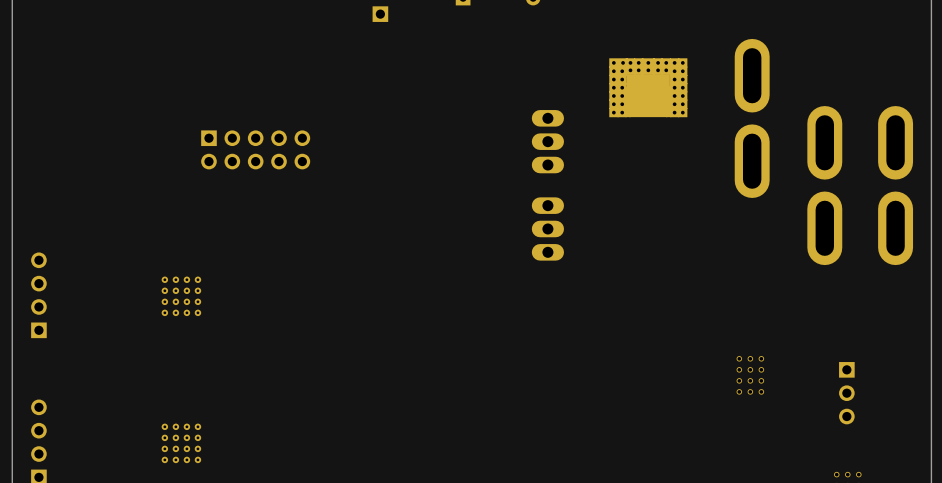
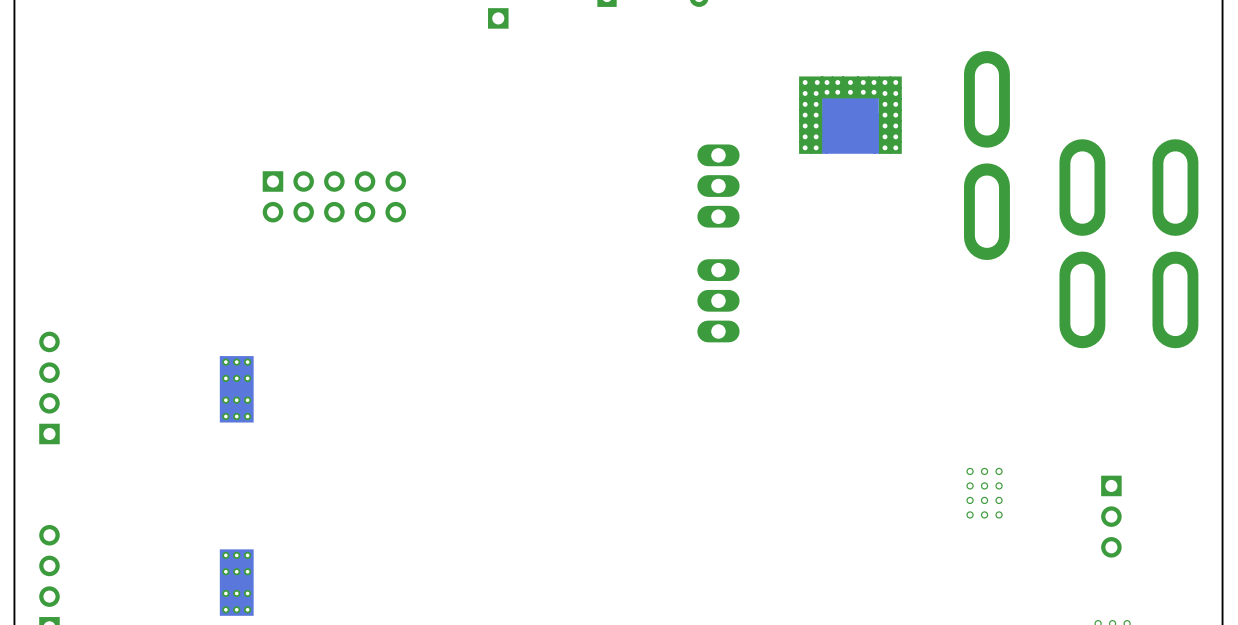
part footprint: [161, 276, 202, 317] -> [219, 356, 254, 423]
part footprint: [161, 423, 202, 464] -> [219, 549, 254, 616]

